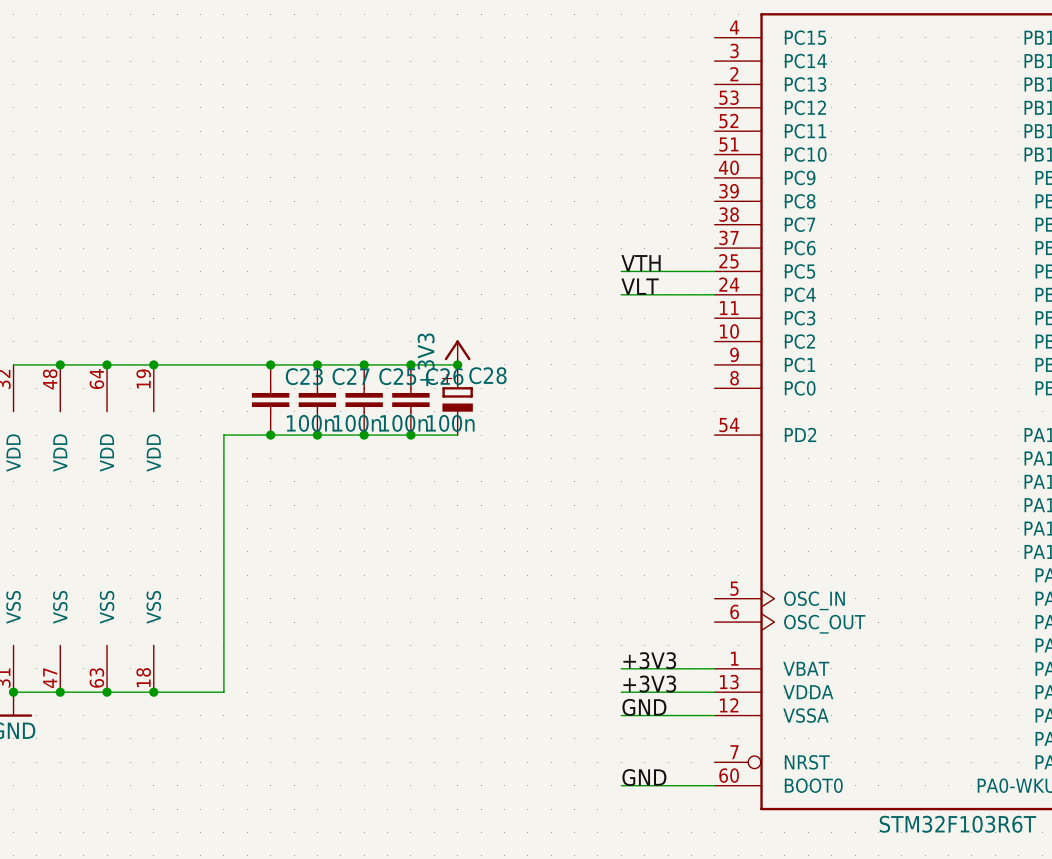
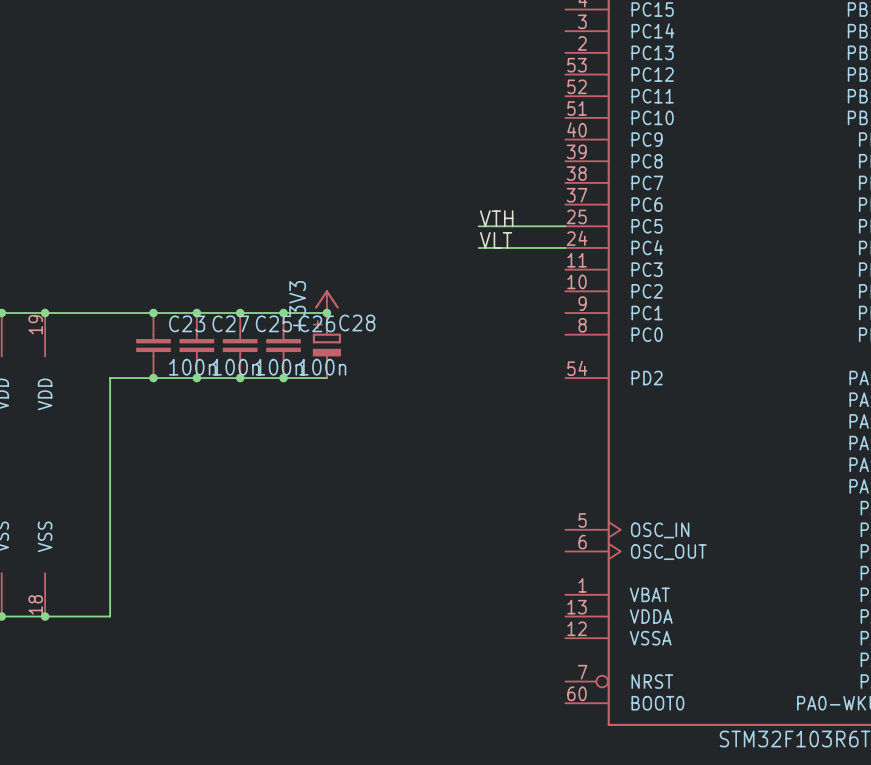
label: +3V3 (649, 660) -> none
wire: (621, 668) (714, 668) -> none
label: +3V3 (649, 684) -> none
wire: (621, 692) (714, 692) -> none
label: GND (644, 707) -> none
wire: (621, 715) (714, 715) -> none
label: GND (644, 777) -> none
wire: (621, 785) (714, 785) -> none

